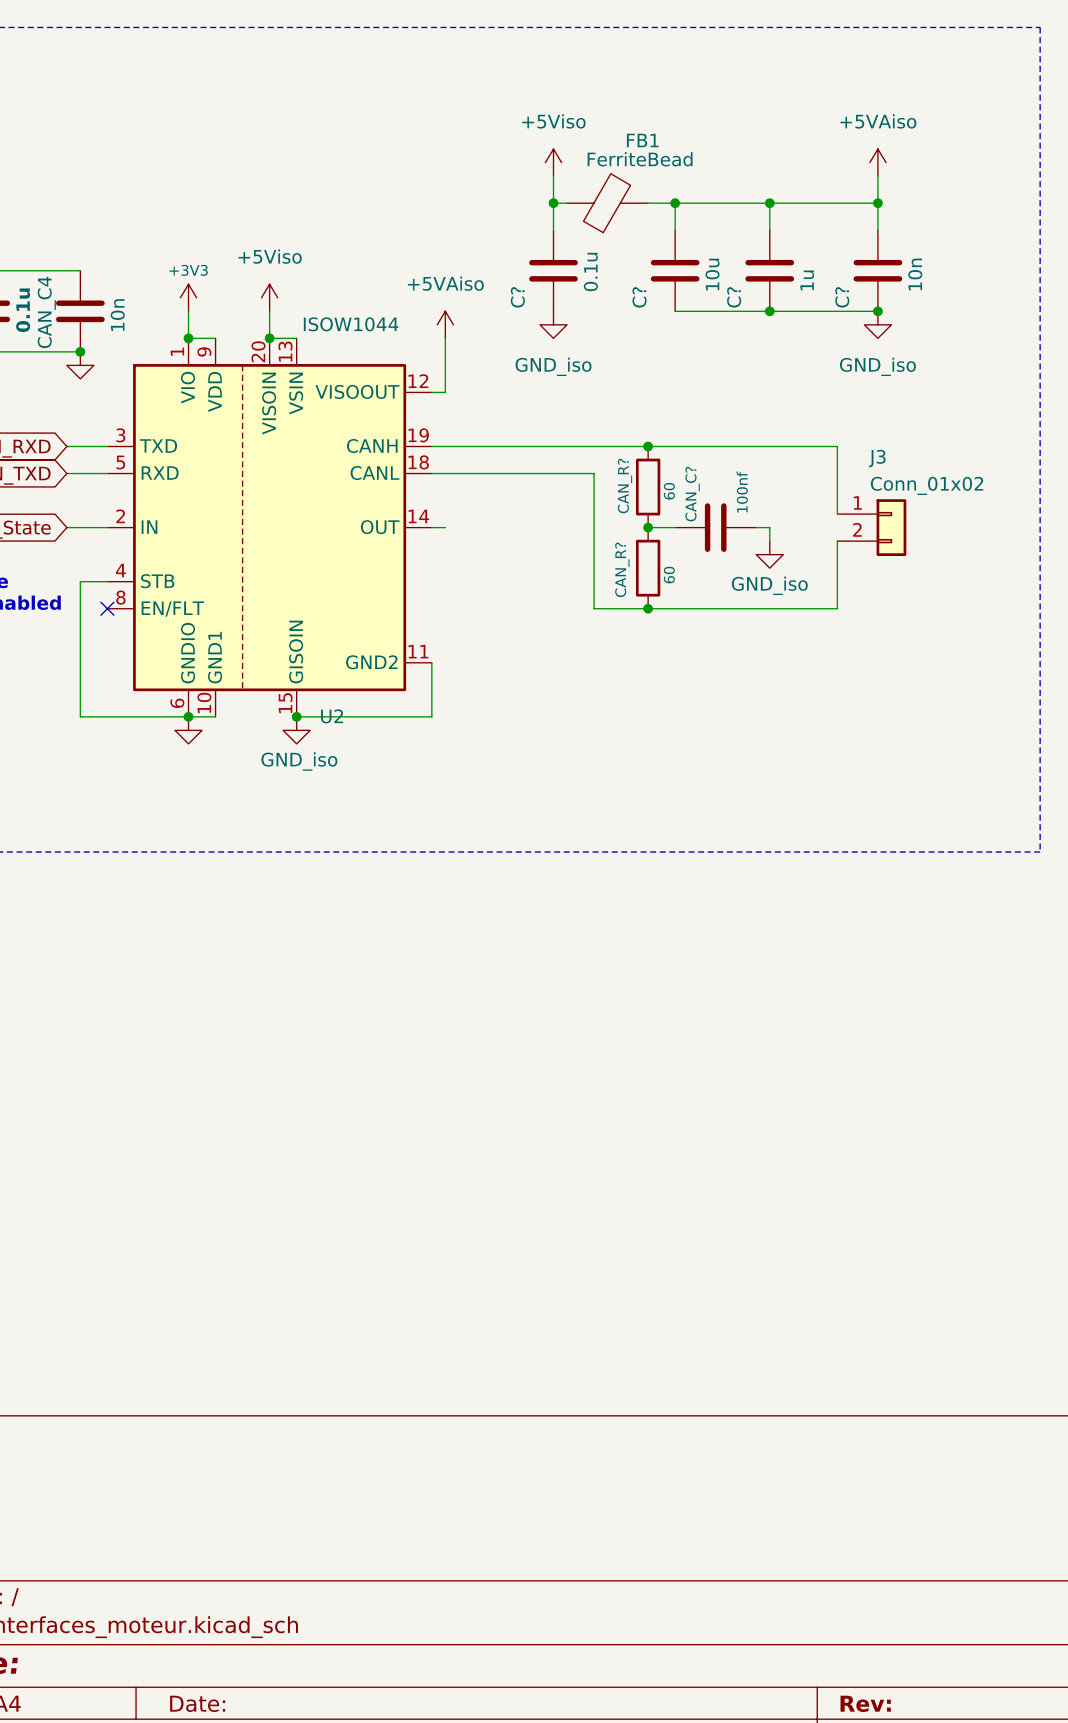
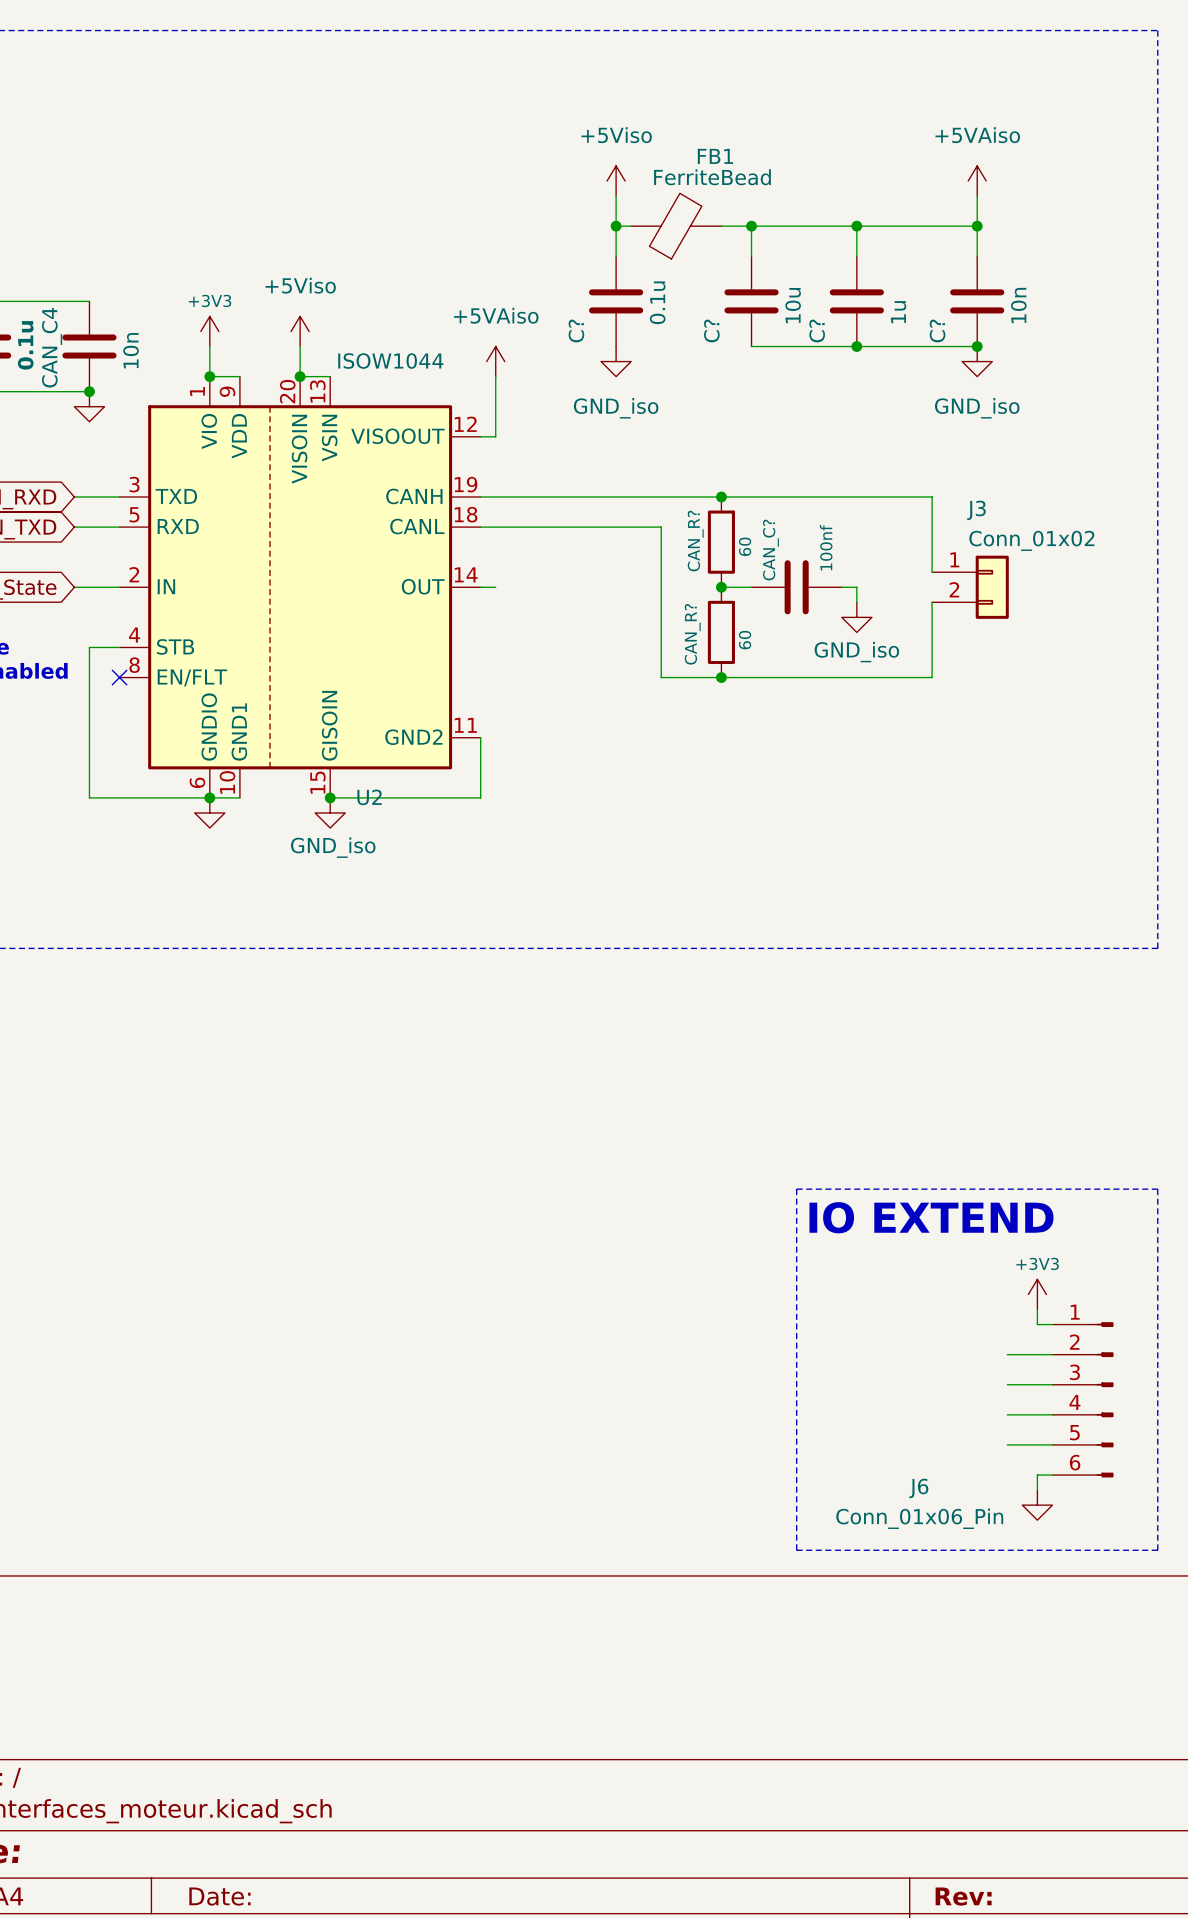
line: none -> (796, 1189) (1157, 1189) (1157, 1550) (796, 1550) (796, 1189)
text: none -> IO EXTEND (931, 1217)
power symbol: none -> +3V3 (1037, 1294)
wire: none -> (1037, 1309) (1037, 1324) (1052, 1324)
wire: none -> (1007, 1354) (1052, 1354)
wire: none -> (1007, 1384) (1052, 1384)
J6: none -> Conn_01x06_Pin (1082, 1399)
wire: none -> (1007, 1414) (1052, 1414)
wire: none -> (1007, 1444) (1052, 1444)
wire: none -> (1052, 1475) (1037, 1475) (1037, 1490)
power symbol: none -> (1037, 1505)

